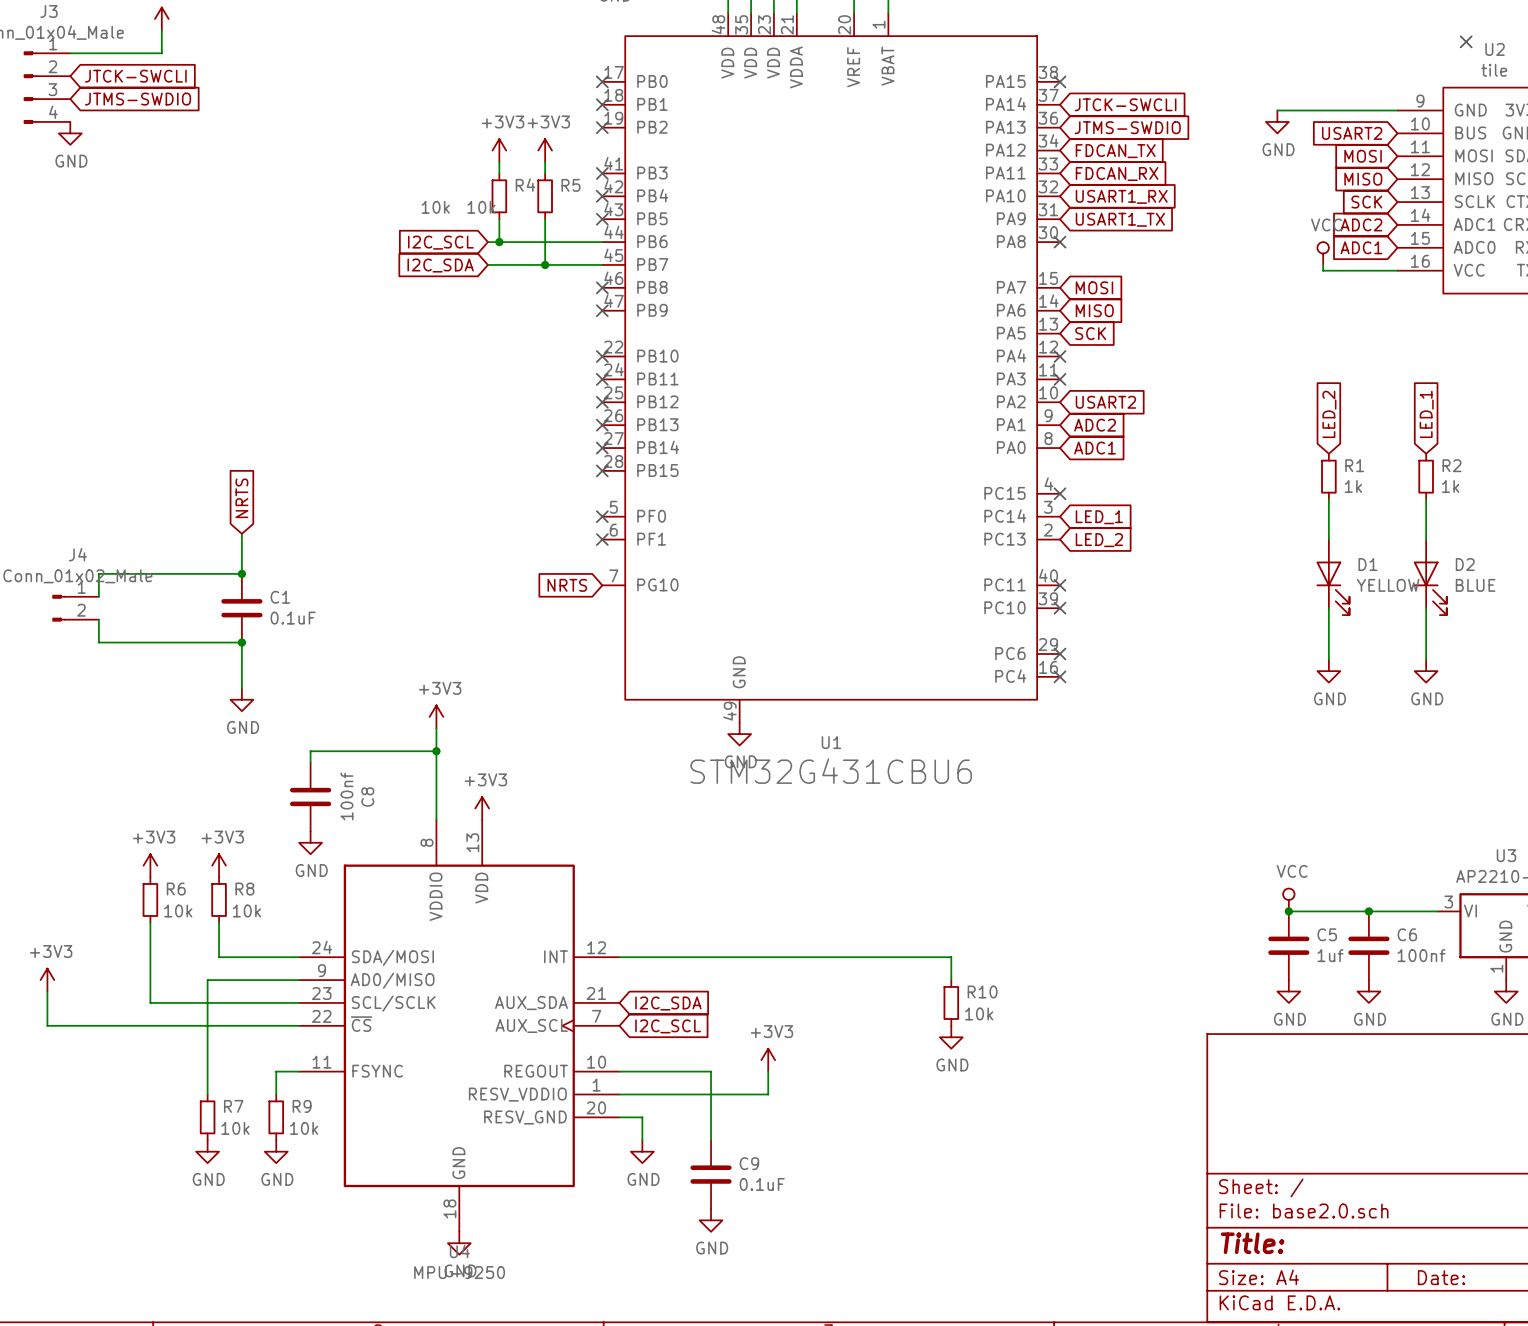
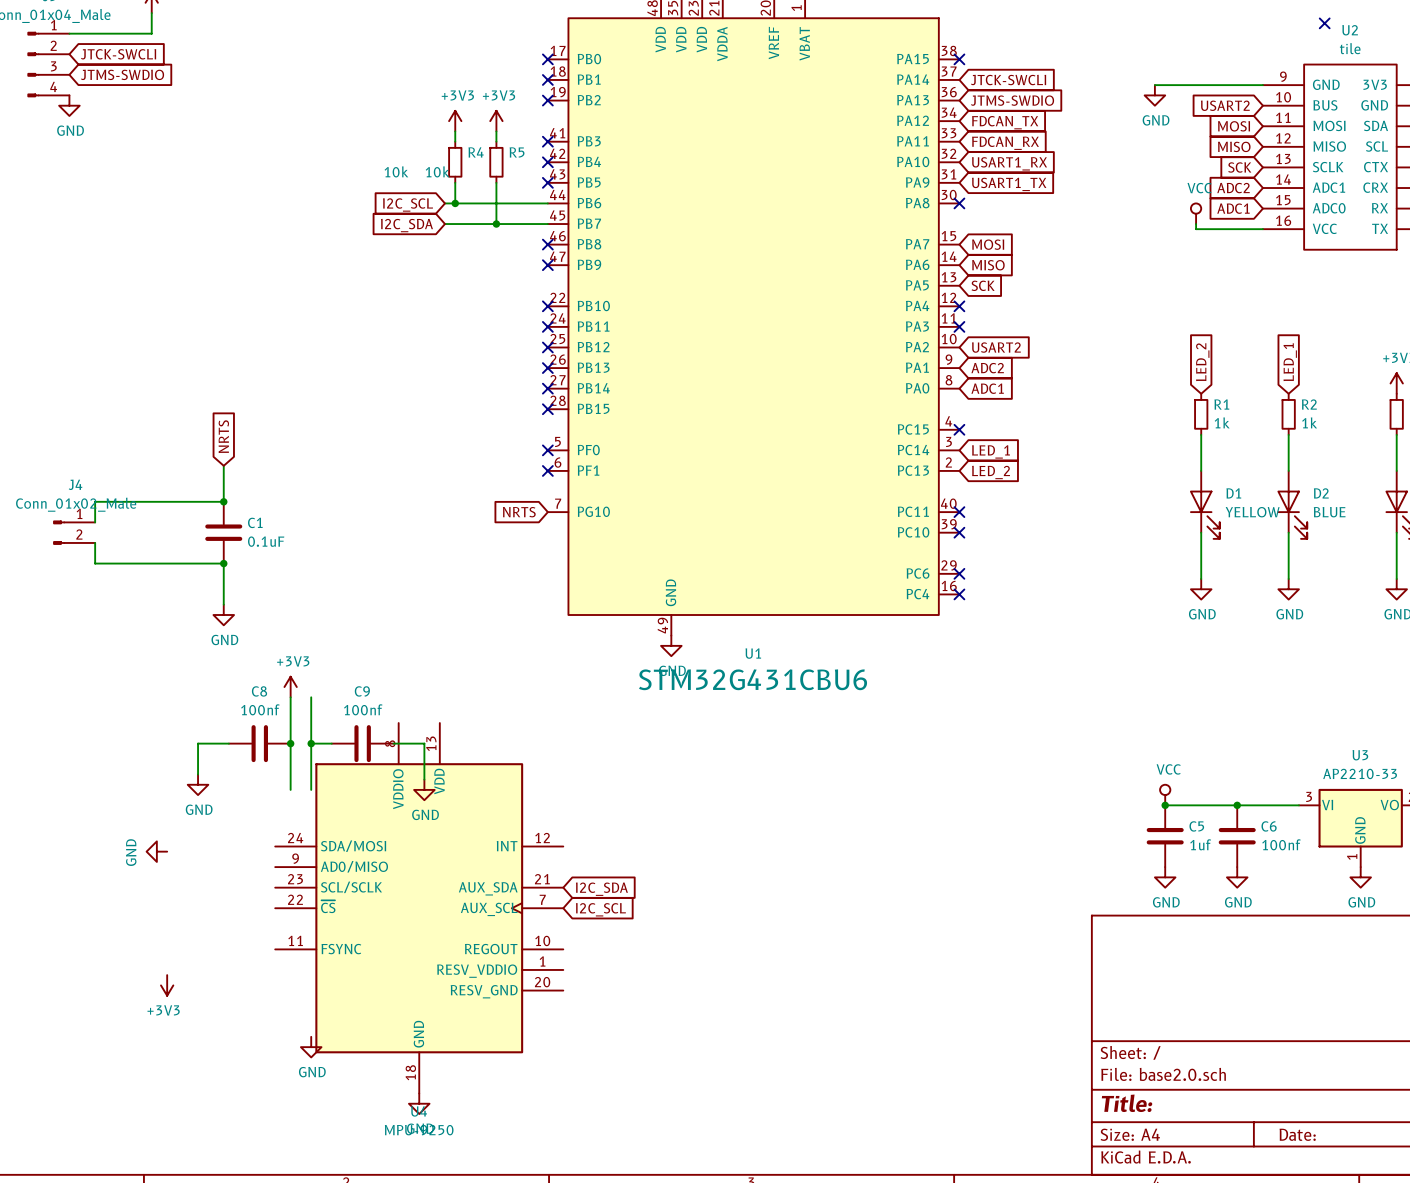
power symbol: +3V3 (436, 716) -> none
wire: (436, 728) (436, 819) -> none
wire: (436, 751) (310, 751) (310, 762) -> none
junction: (436, 751) -> none
power symbol: none -> +3V3 (290, 687)
wire: none -> (290, 697) (290, 789)
wire: none -> (311, 697) (311, 789)
C8 value position: 100nf (346, 796) -> 100nf (260, 709)
C8 rotation: 0° (310, 797) -> 90° clockwise (259, 743)
C8 position: (310, 797) -> (259, 743)
C8 name position: C8 (367, 797) -> C8 (259, 691)
power symbol: +3V3 (482, 808) -> none
wire: none -> (228, 743) (198, 743) (198, 774)
power symbol: GND (310, 842) -> none
junction: none -> (290, 743)
wire: none -> (311, 743) (331, 743)
junction: none -> (311, 743)
wire: none -> (393, 743) (424, 743) (424, 779)
power symbol: +3V3 (150, 865) -> none
power symbol: +3V3 (219, 865) -> none
power symbol: none -> GND (198, 784)
power symbol: none -> GND (424, 789)
R6: 10k (150, 899) -> none
R8: 10k (219, 899) -> none
wire: (150, 922) (150, 1002) (299, 1002) -> none
wire: (219, 922) (219, 957) (299, 957) -> none
wire: (619, 957) (951, 957) (951, 980) -> none
power symbol: none -> GND (156, 851)
power symbol: +3V3 (47, 980) -> none
wire: (299, 980) (207, 980) (207, 1094) -> none
wire: (47, 991) (47, 1025) (299, 1025) -> none
R10: 10k (951, 1002) -> none
power symbol: GND (951, 1037) -> none
power symbol: +3V3 (768, 1060) -> none
wire: (299, 1071) (276, 1071) (276, 1094) -> none
wire: (619, 1071) (711, 1071) (711, 1140) -> none
wire: (768, 1071) (768, 1094) (619, 1094) -> none
power symbol: none -> +3V3 (167, 985)
R7: 10k (207, 1117) -> none
R9: 10k (276, 1117) -> none
wire: (619, 1117) (642, 1117) (642, 1140) -> none
power symbol: GND (207, 1151) -> none
power symbol: GND (276, 1151) -> none
power symbol: GND (642, 1151) -> none
C9 name position: C9 (749, 1163) -> C9 (362, 691)
C9 rotation: 0° (711, 1174) -> 90° clockwise (362, 743)
C9 position: (711, 1174) -> (362, 743)
power symbol: none -> GND (311, 1047)
C9 value: 0.1uF (762, 1184) -> 100nf (363, 709)
power symbol: GND (711, 1220) -> none

